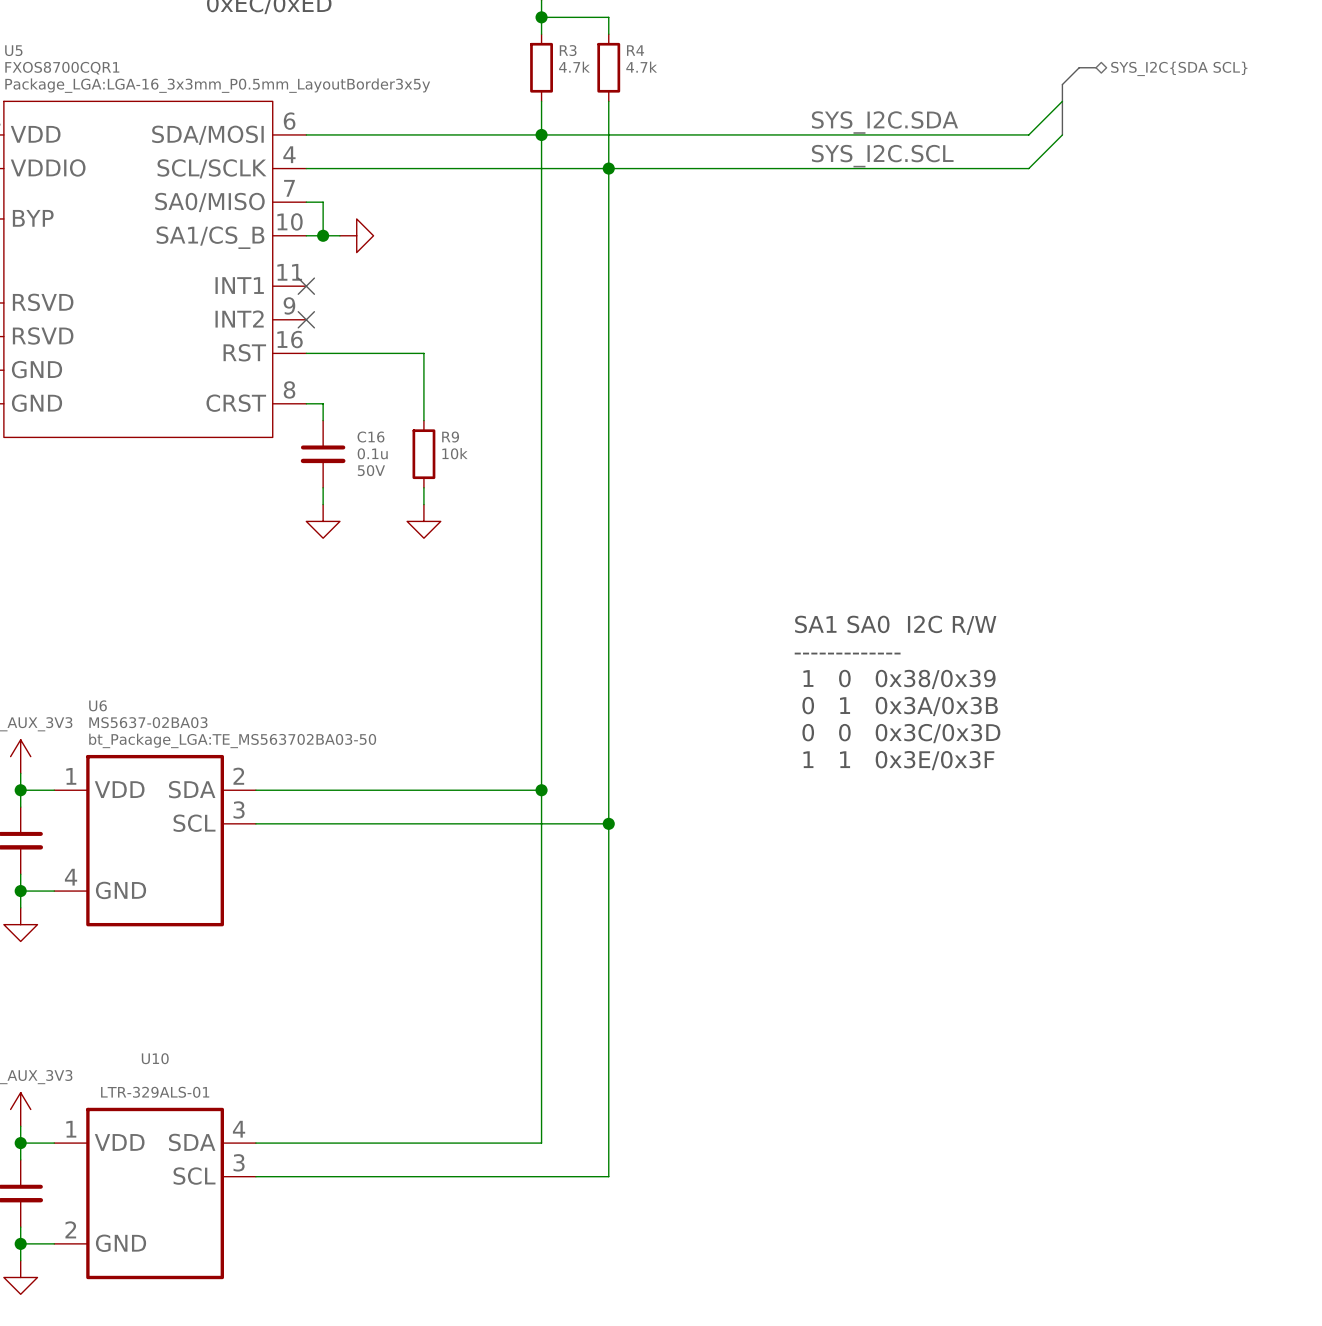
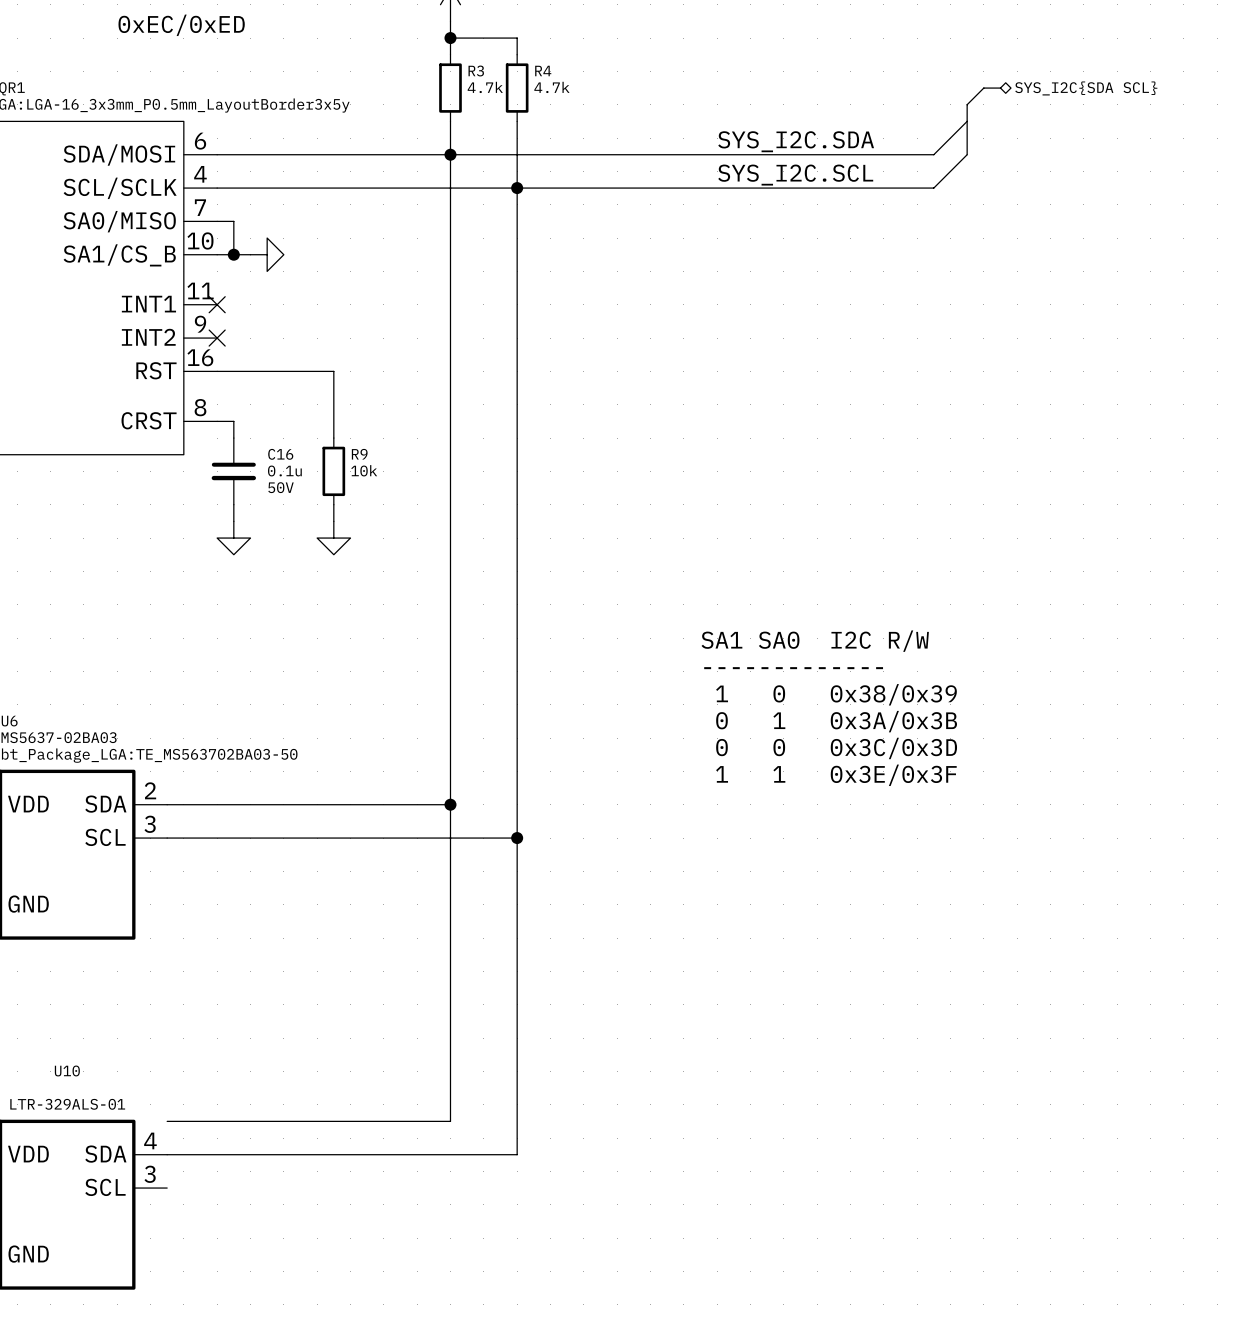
wire: none -> (167, 1121) (450, 1121)
wire: (541, 1109) (541, 1143) -> (517, 1154) (450, 1154)
wire: (608, 1143) (608, 1176) (255, 1176) -> none

